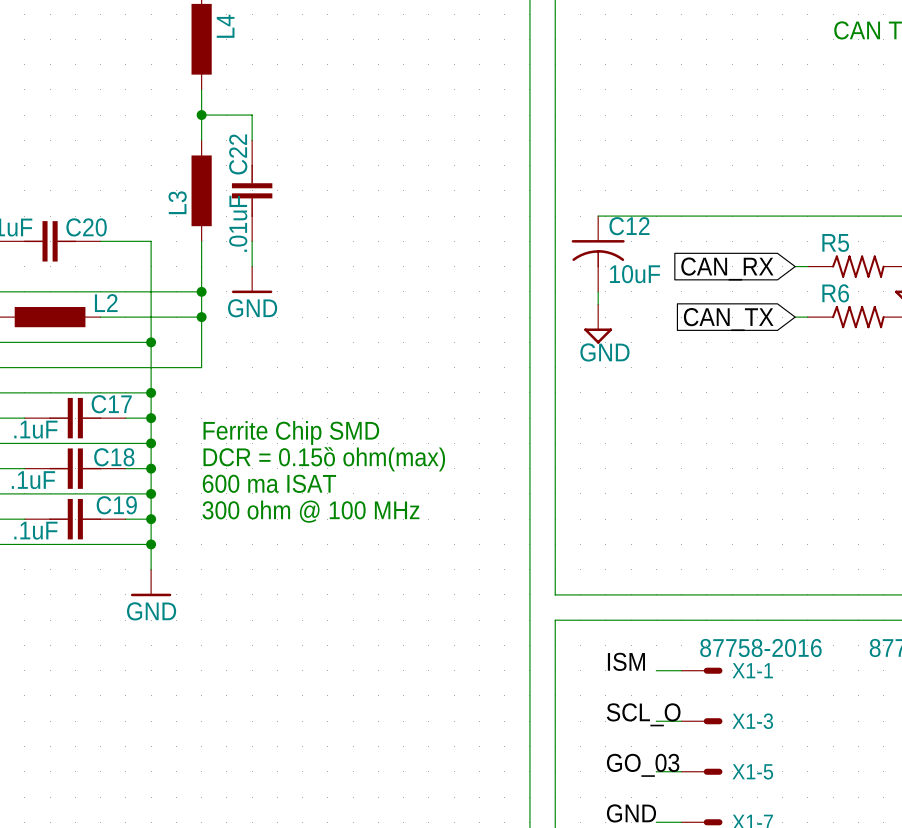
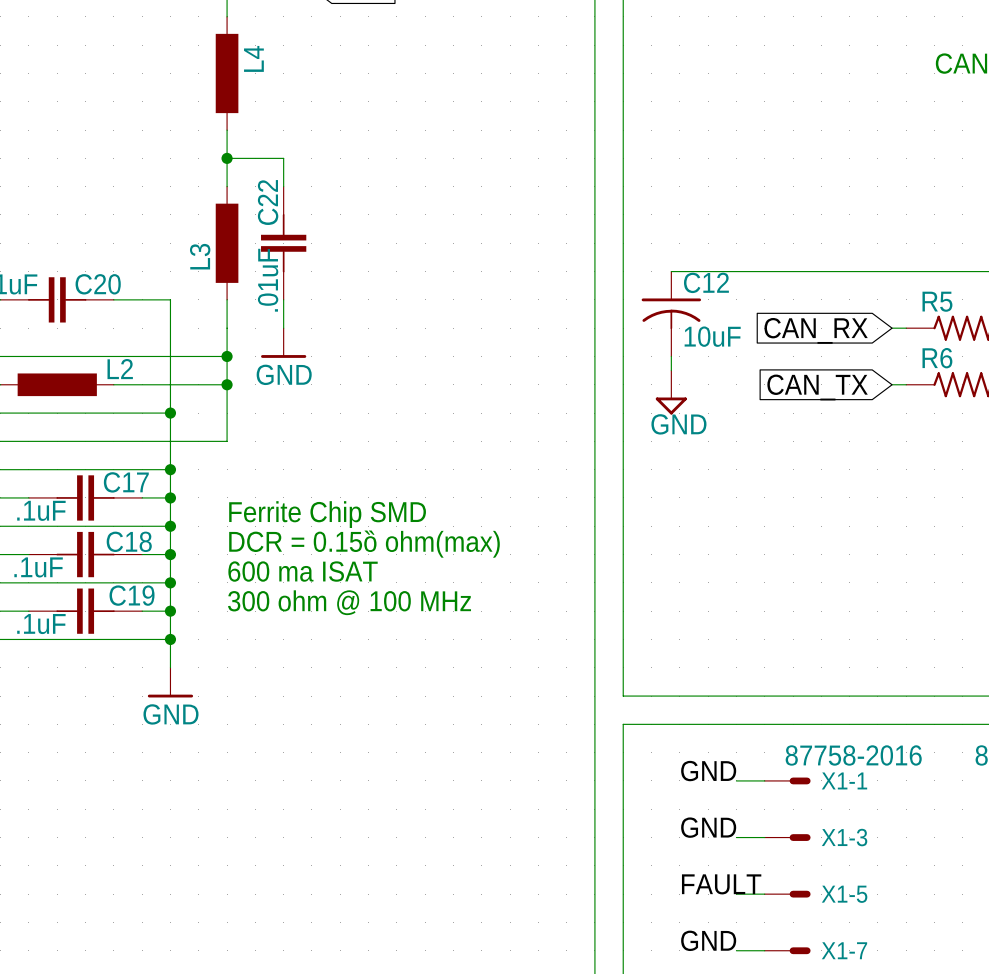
label: ISM (626, 661) -> GND (708, 771)
label: SCL_O (643, 714) -> GND (708, 827)
label: GO_03 (643, 765) -> FAULT (721, 884)

